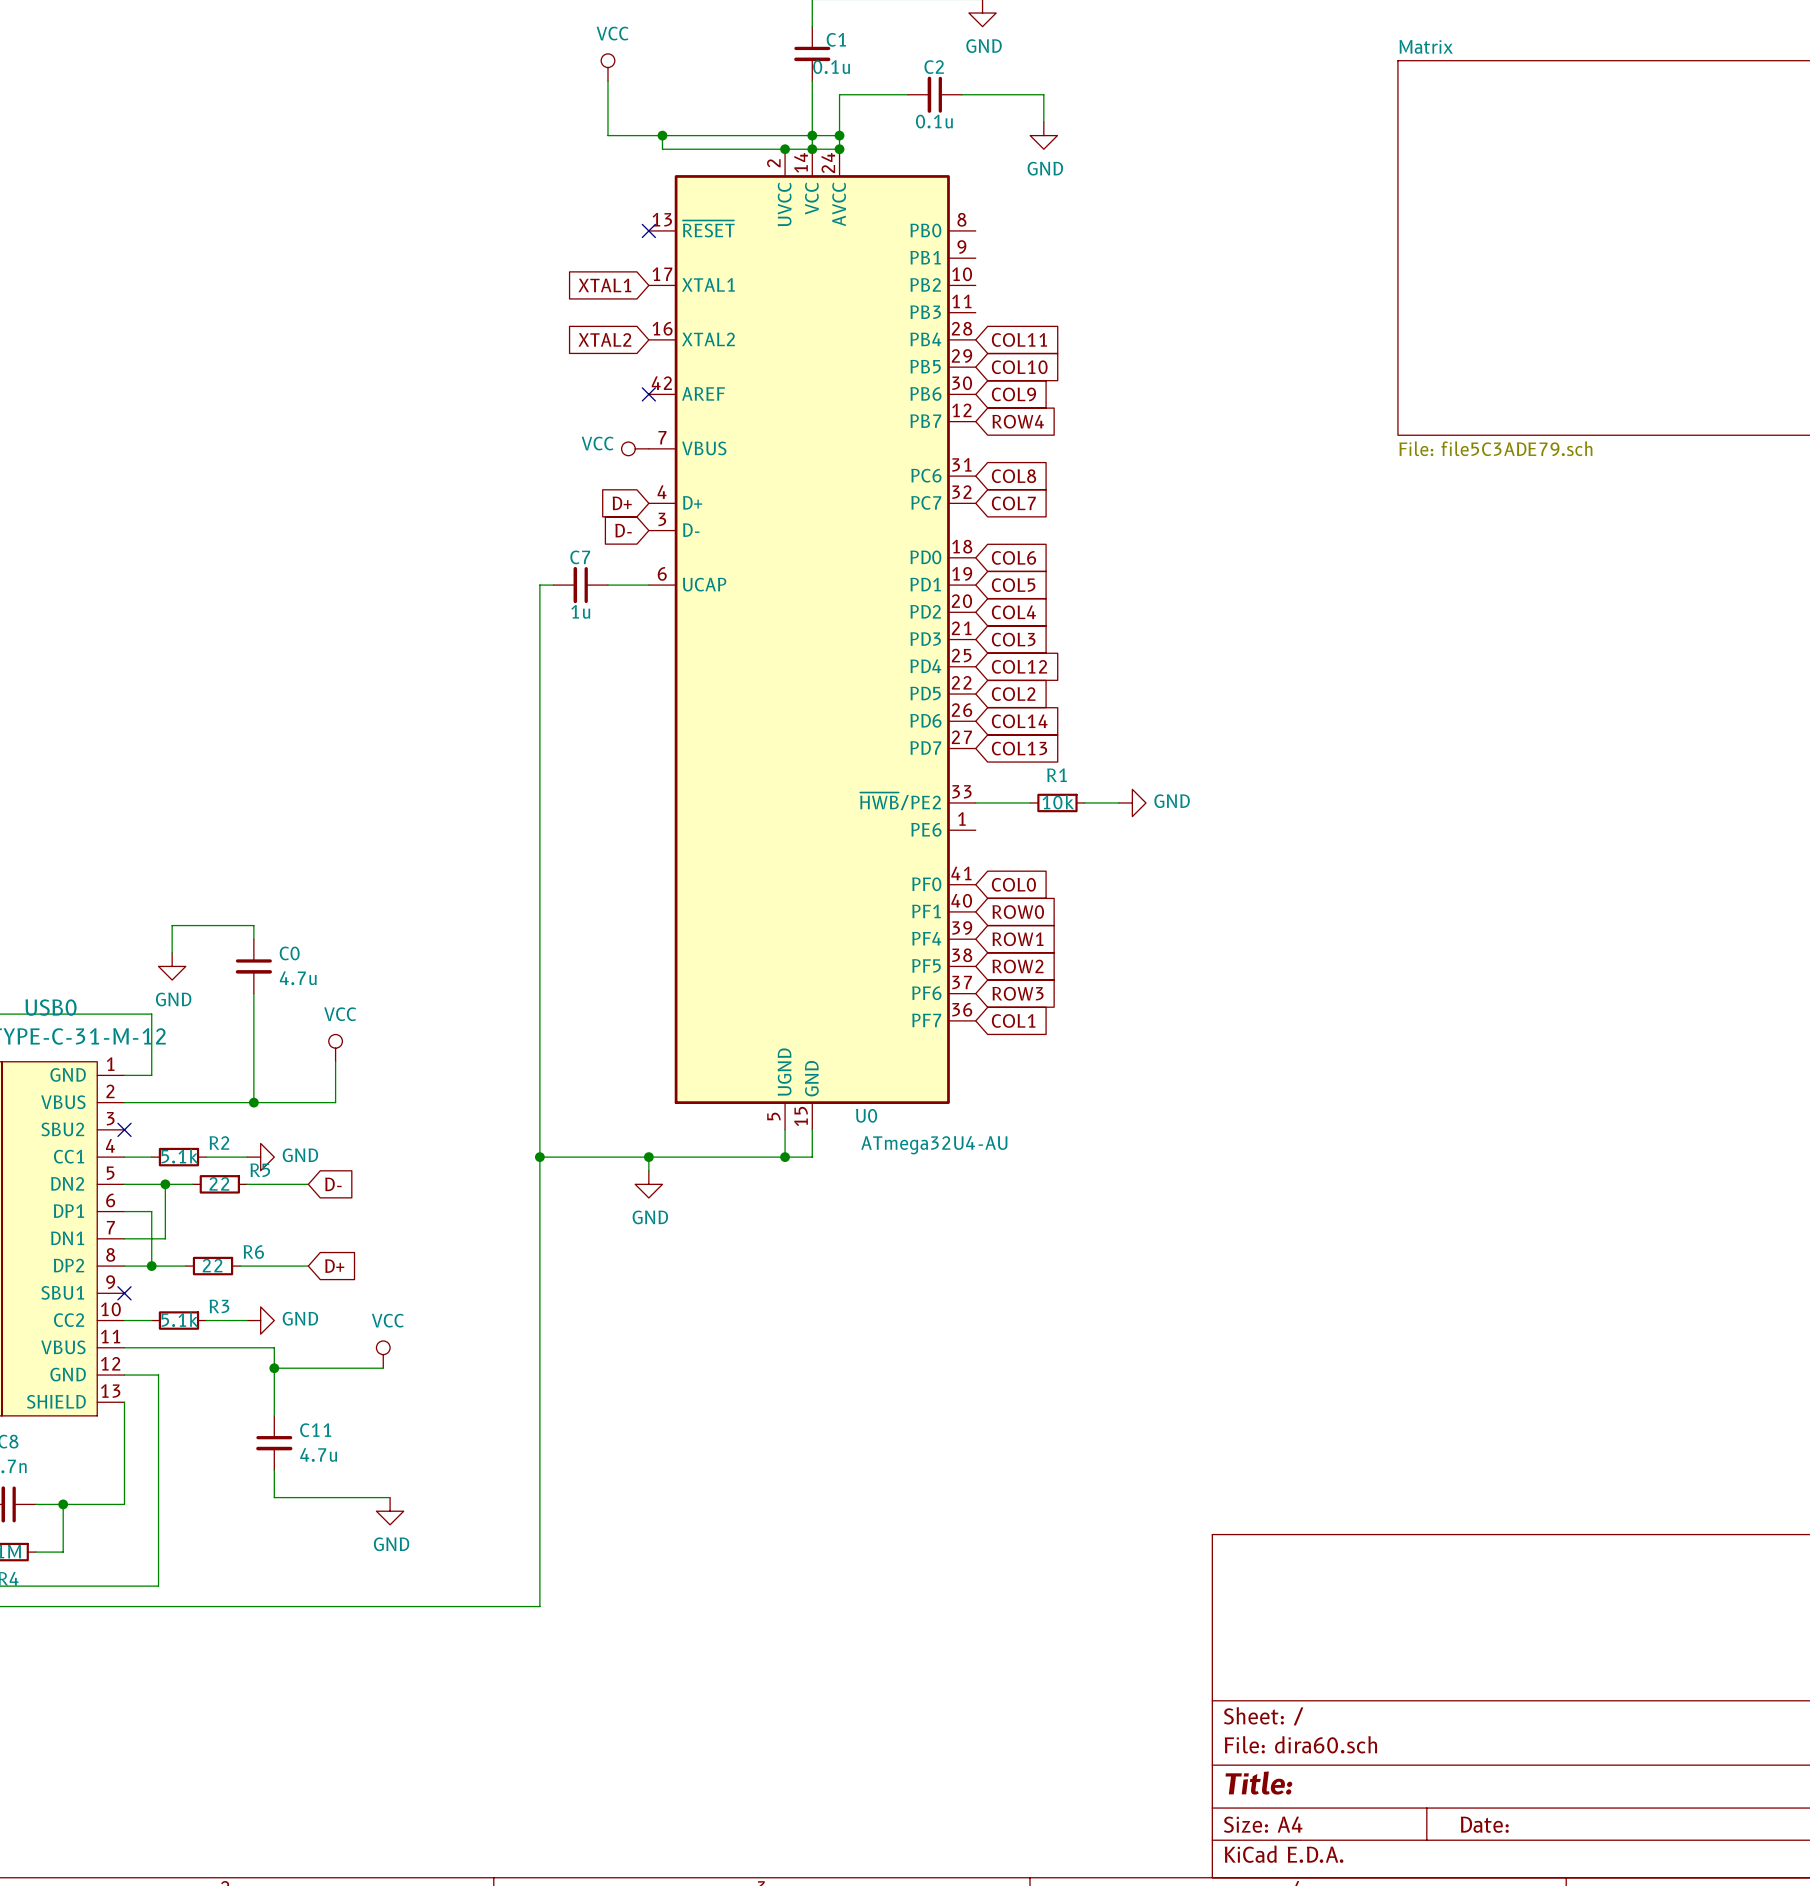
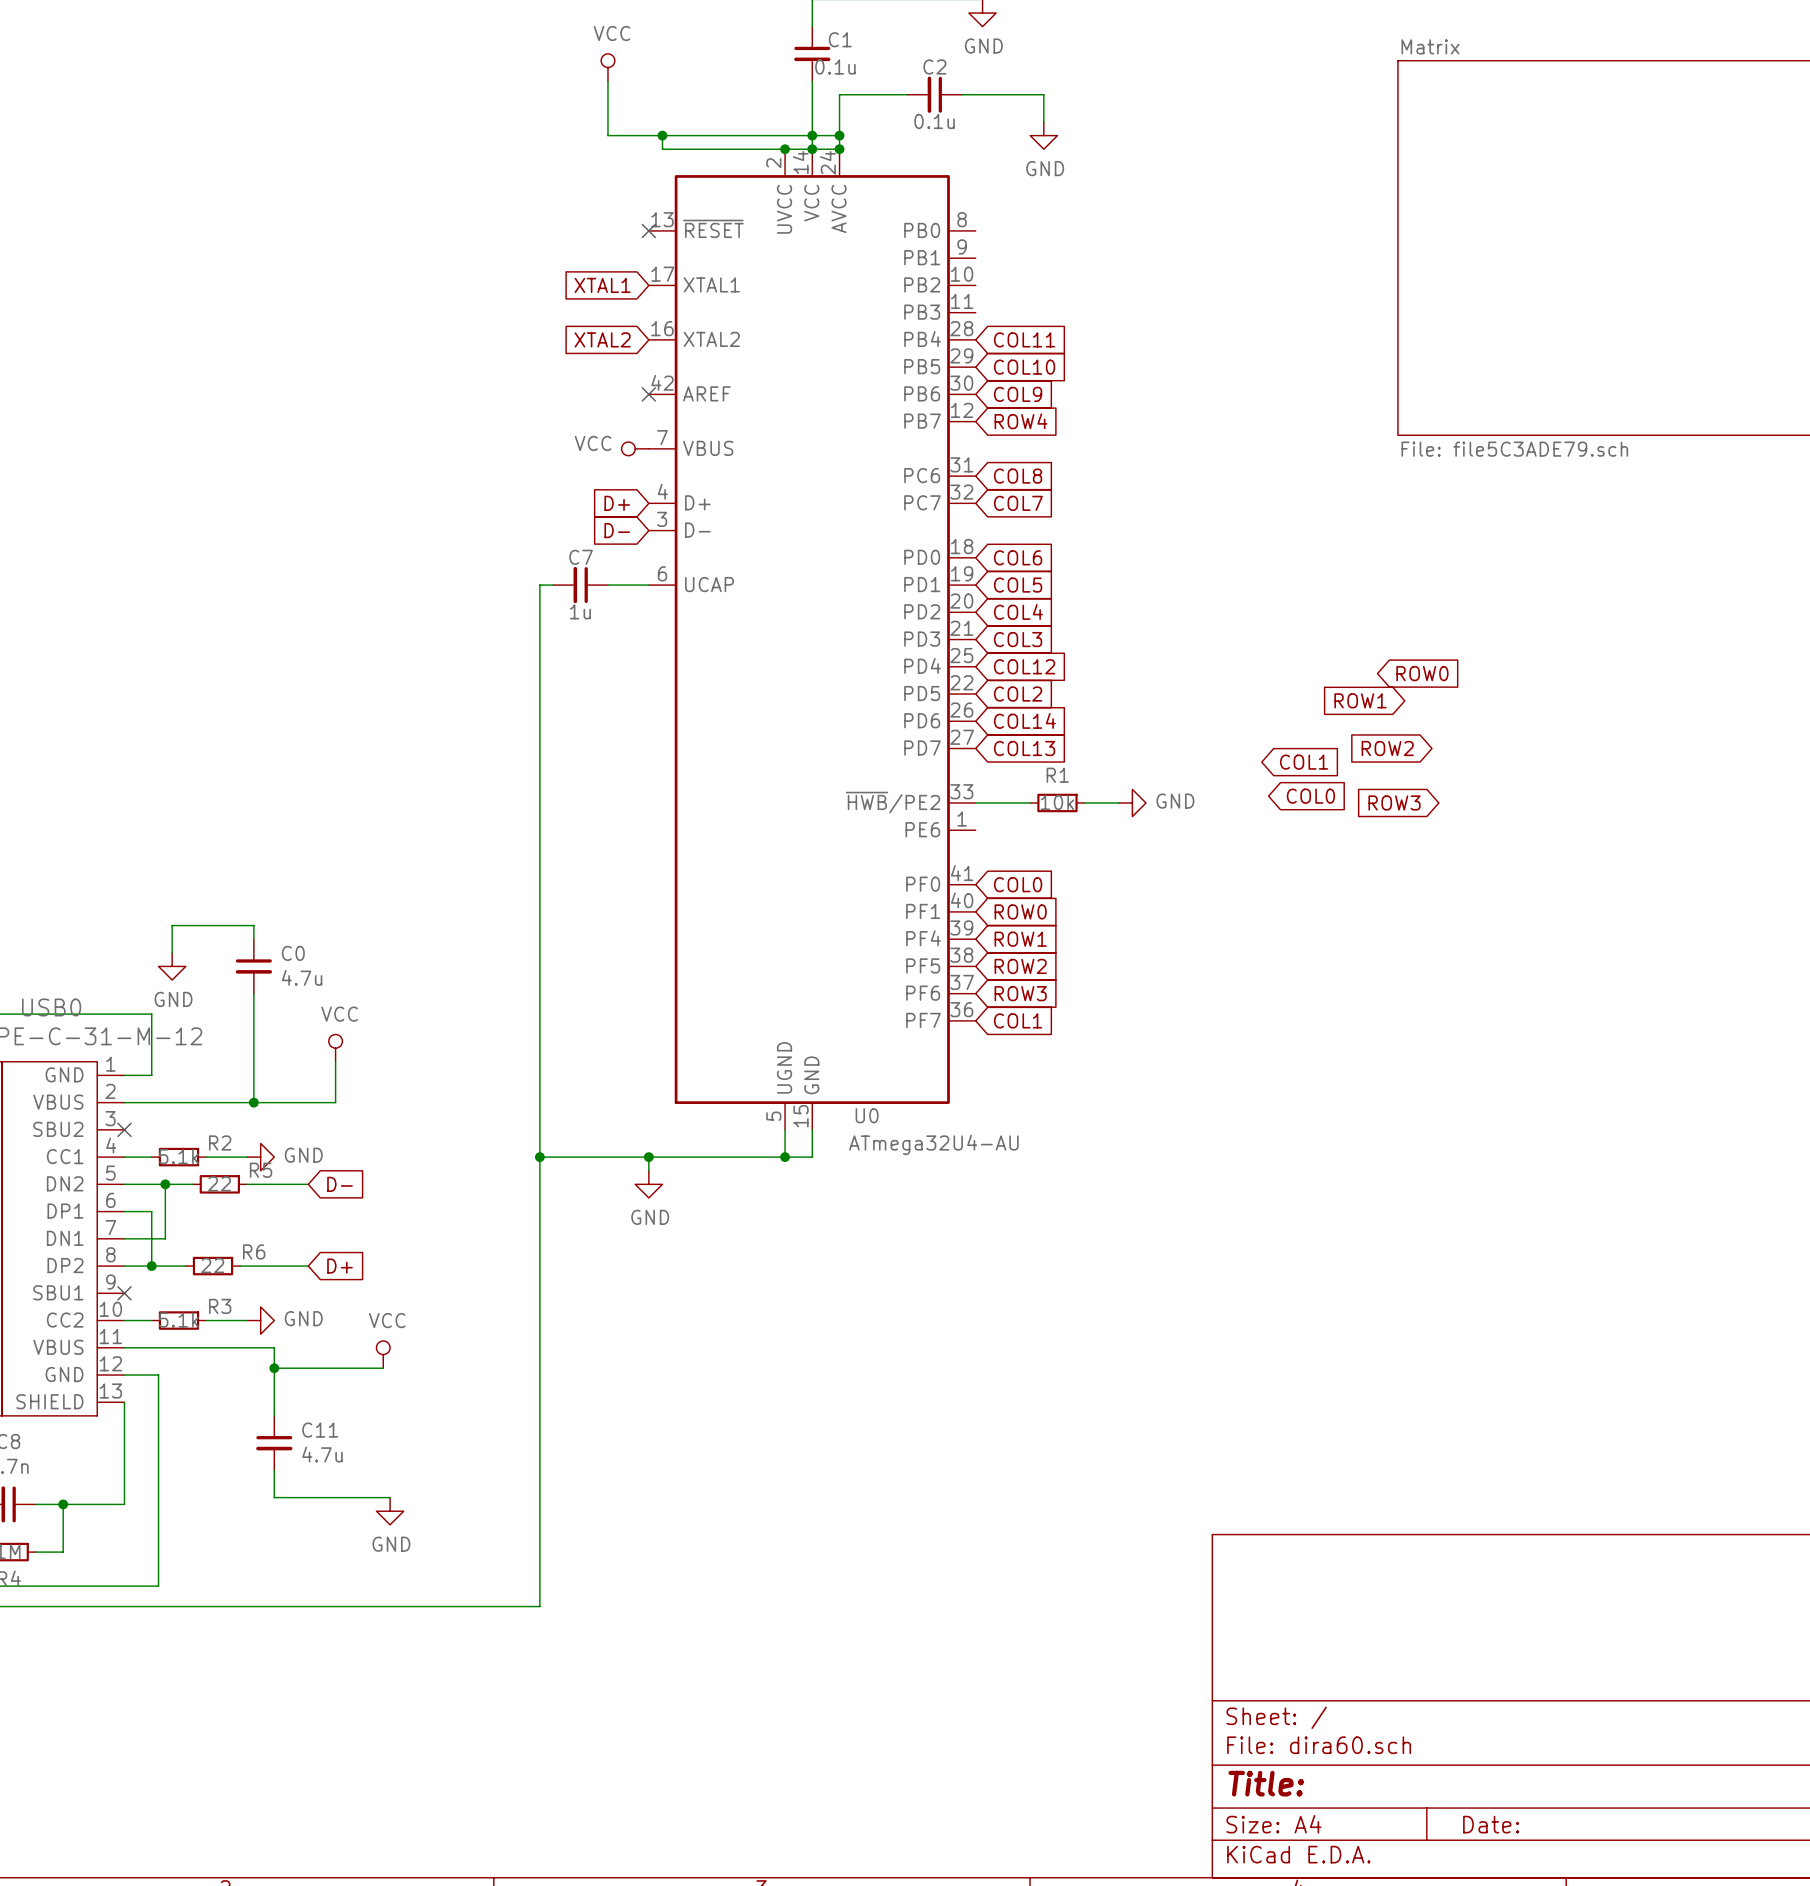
global label: none -> ROW0 (1422, 673)
global label: none -> ROW1 (1360, 700)
global label: none -> ROW2 (1387, 748)
global label: none -> COL1 (1304, 762)
global label: none -> COL0 (1310, 796)
global label: none -> ROW3 (1394, 802)

